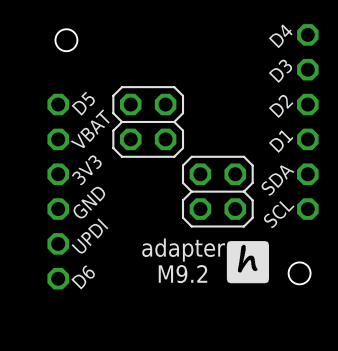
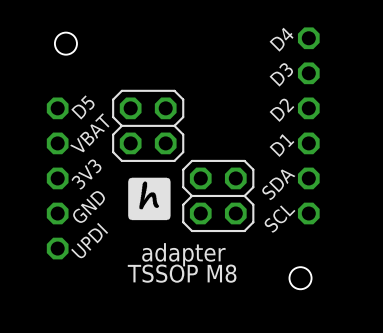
drawing: none -> [128, 177, 171, 221]
part: (58, 191) -> none
drawing: [226, 241, 270, 284] -> none
text: M9.2 (182, 274) -> TSSOP M8 (182, 273)
text: D6 (83, 277) -> none

